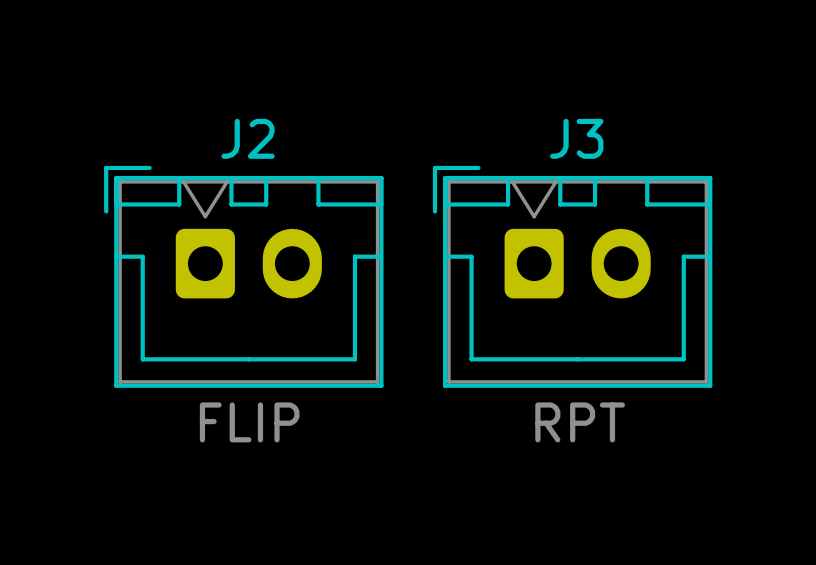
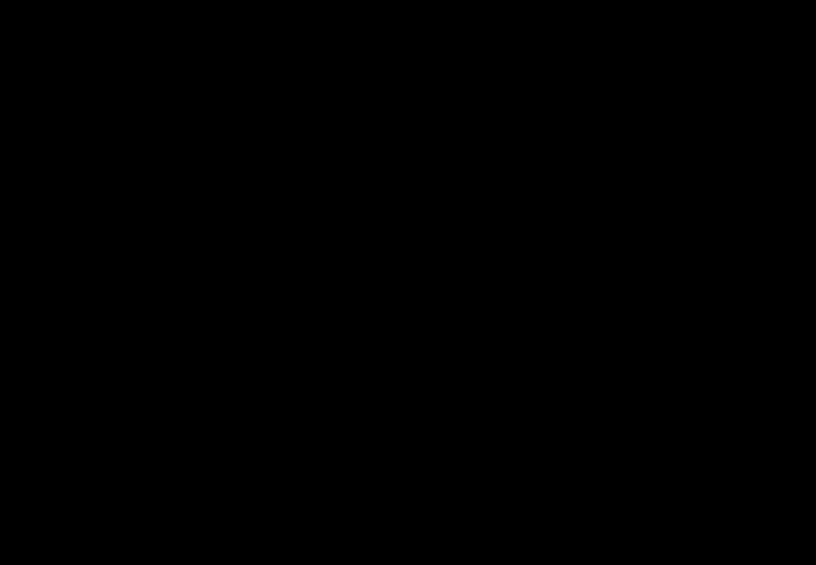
J2: FLIP (243, 276) -> none
J3: RPT (572, 276) -> none

